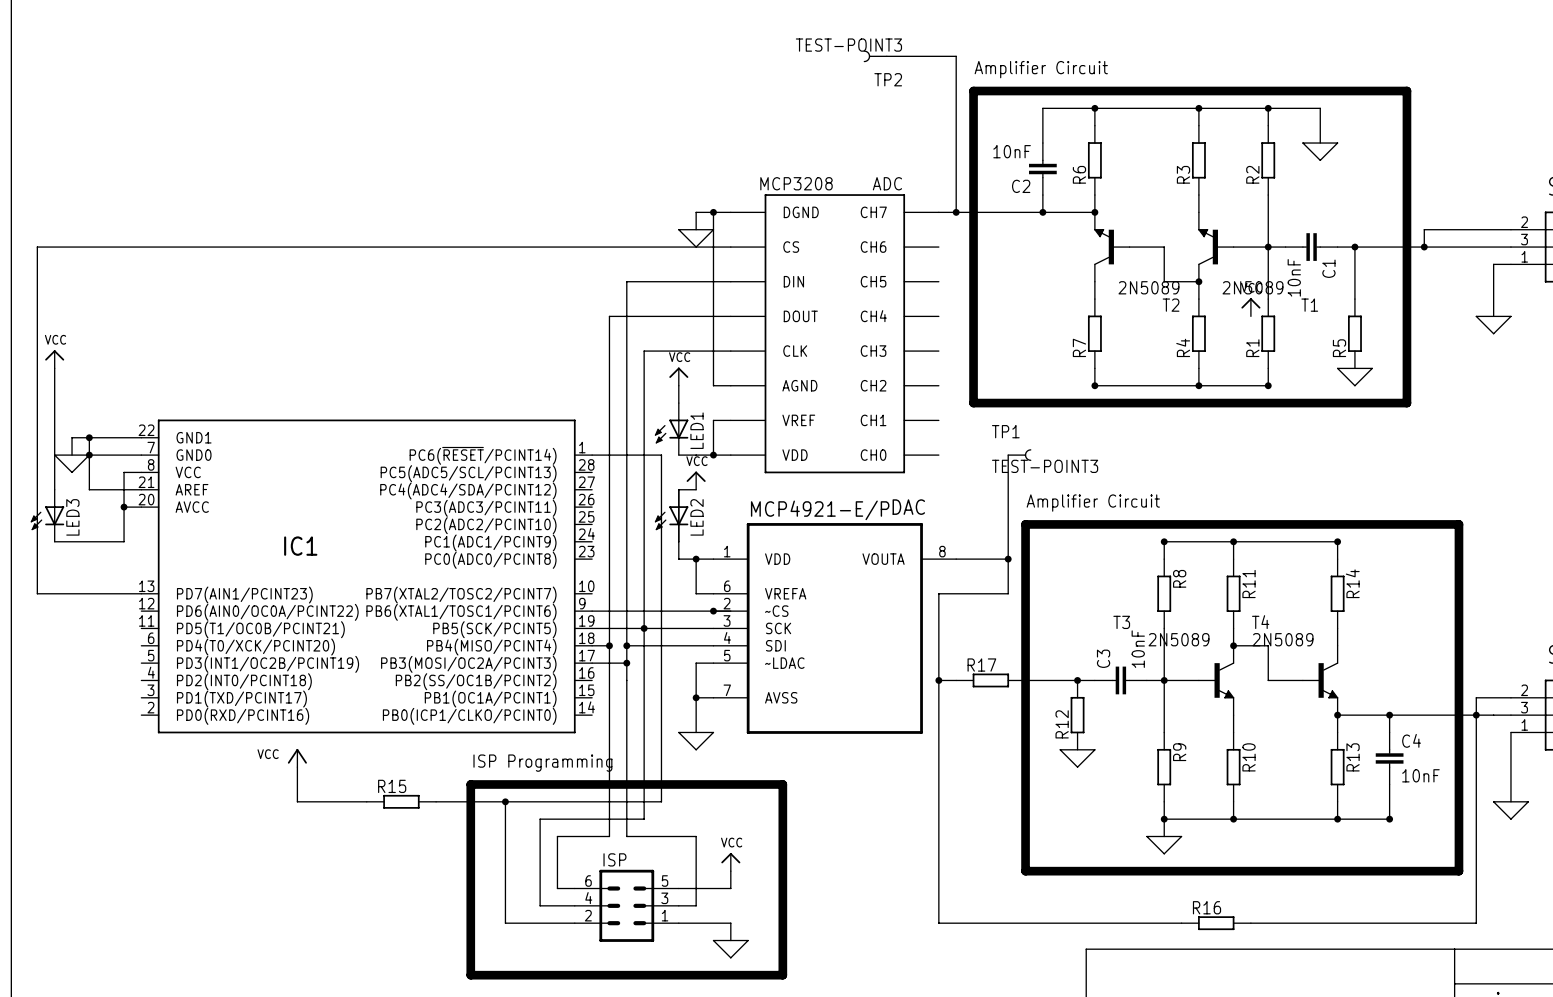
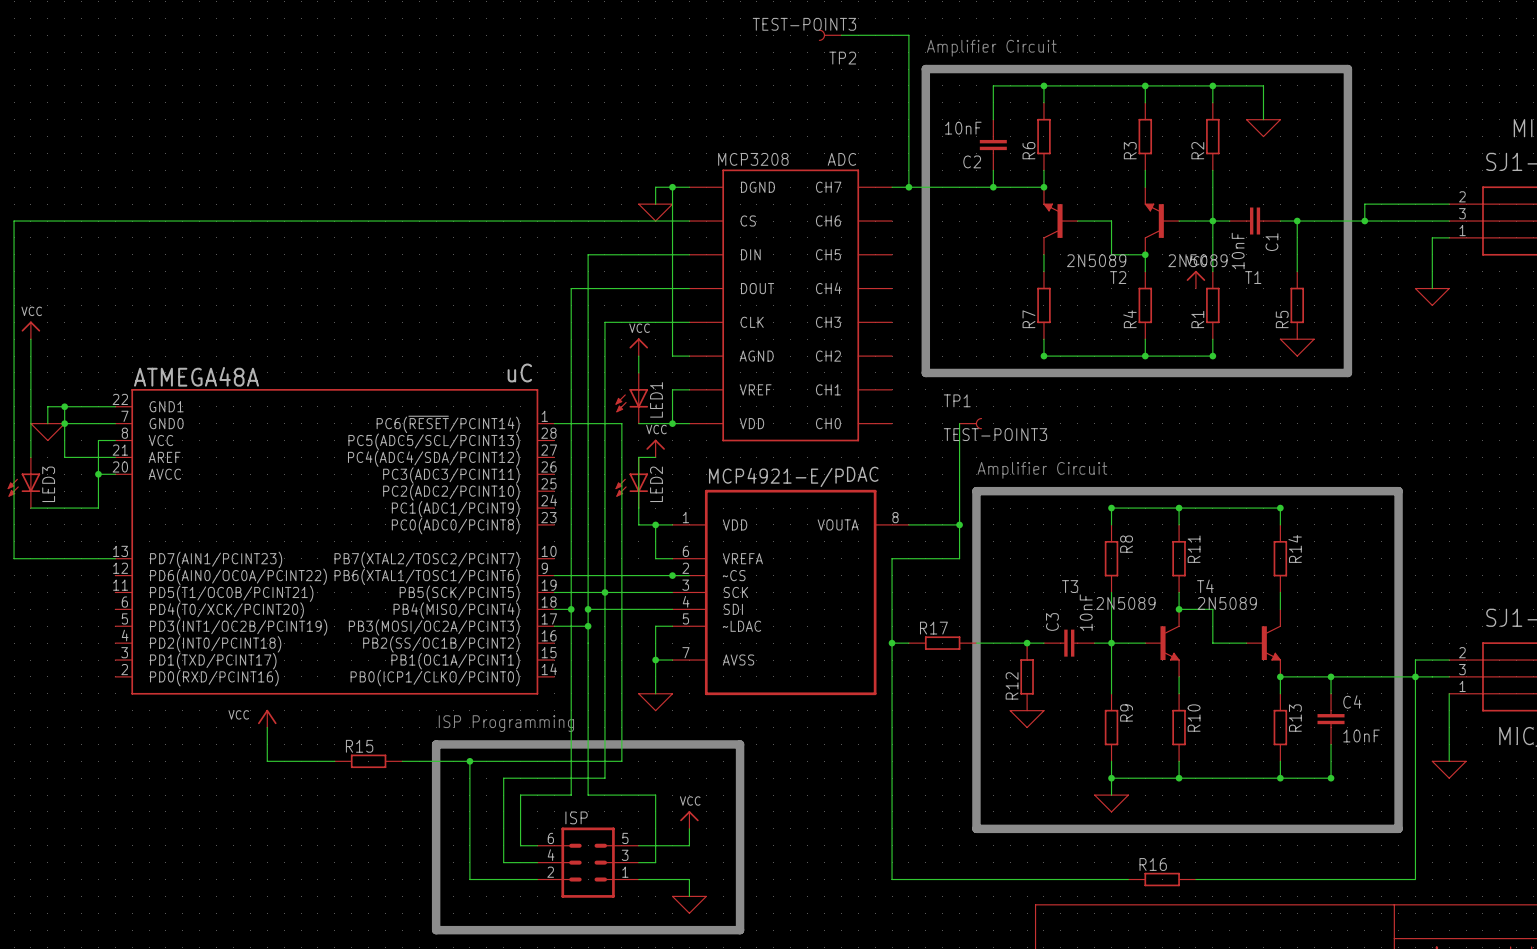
IC1 value: none -> uC (519, 372)
IC1 name: IC1 (300, 546) -> ATMEGA48A (196, 376)

